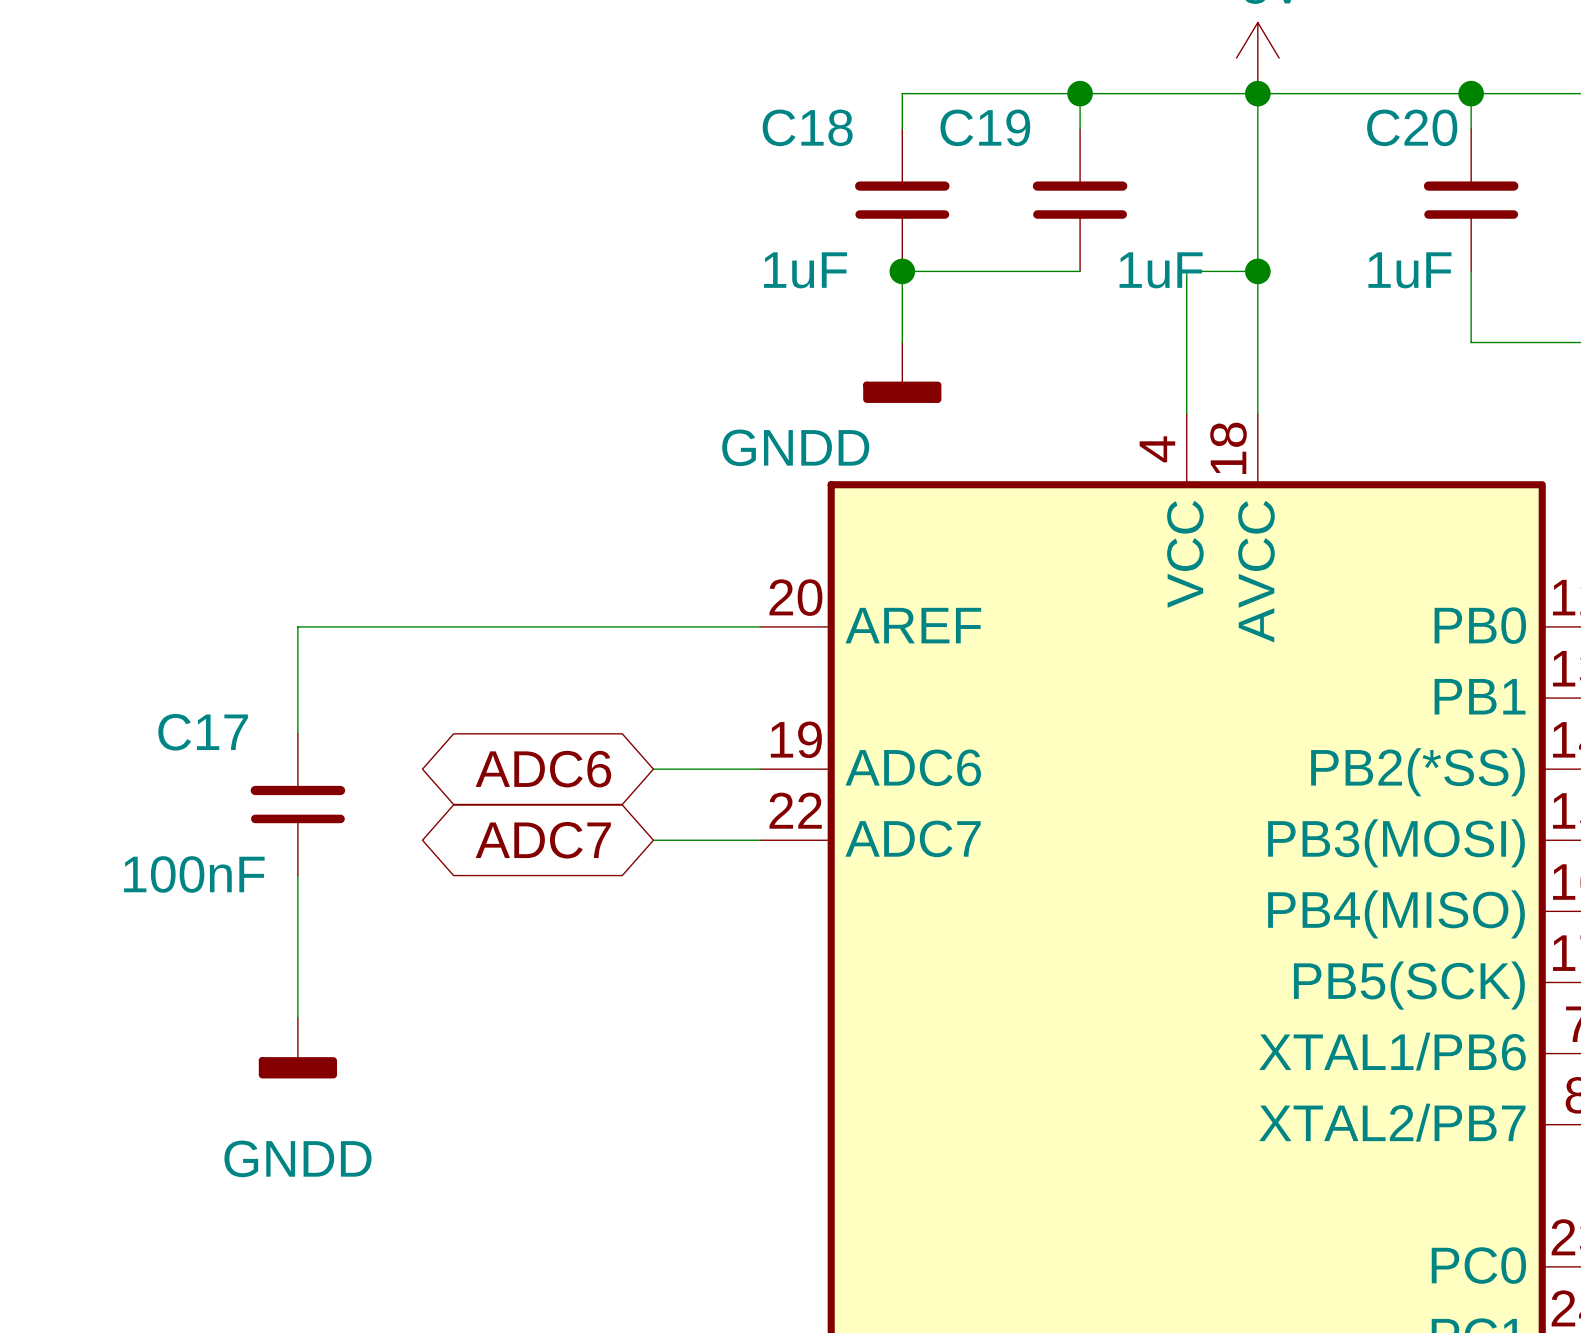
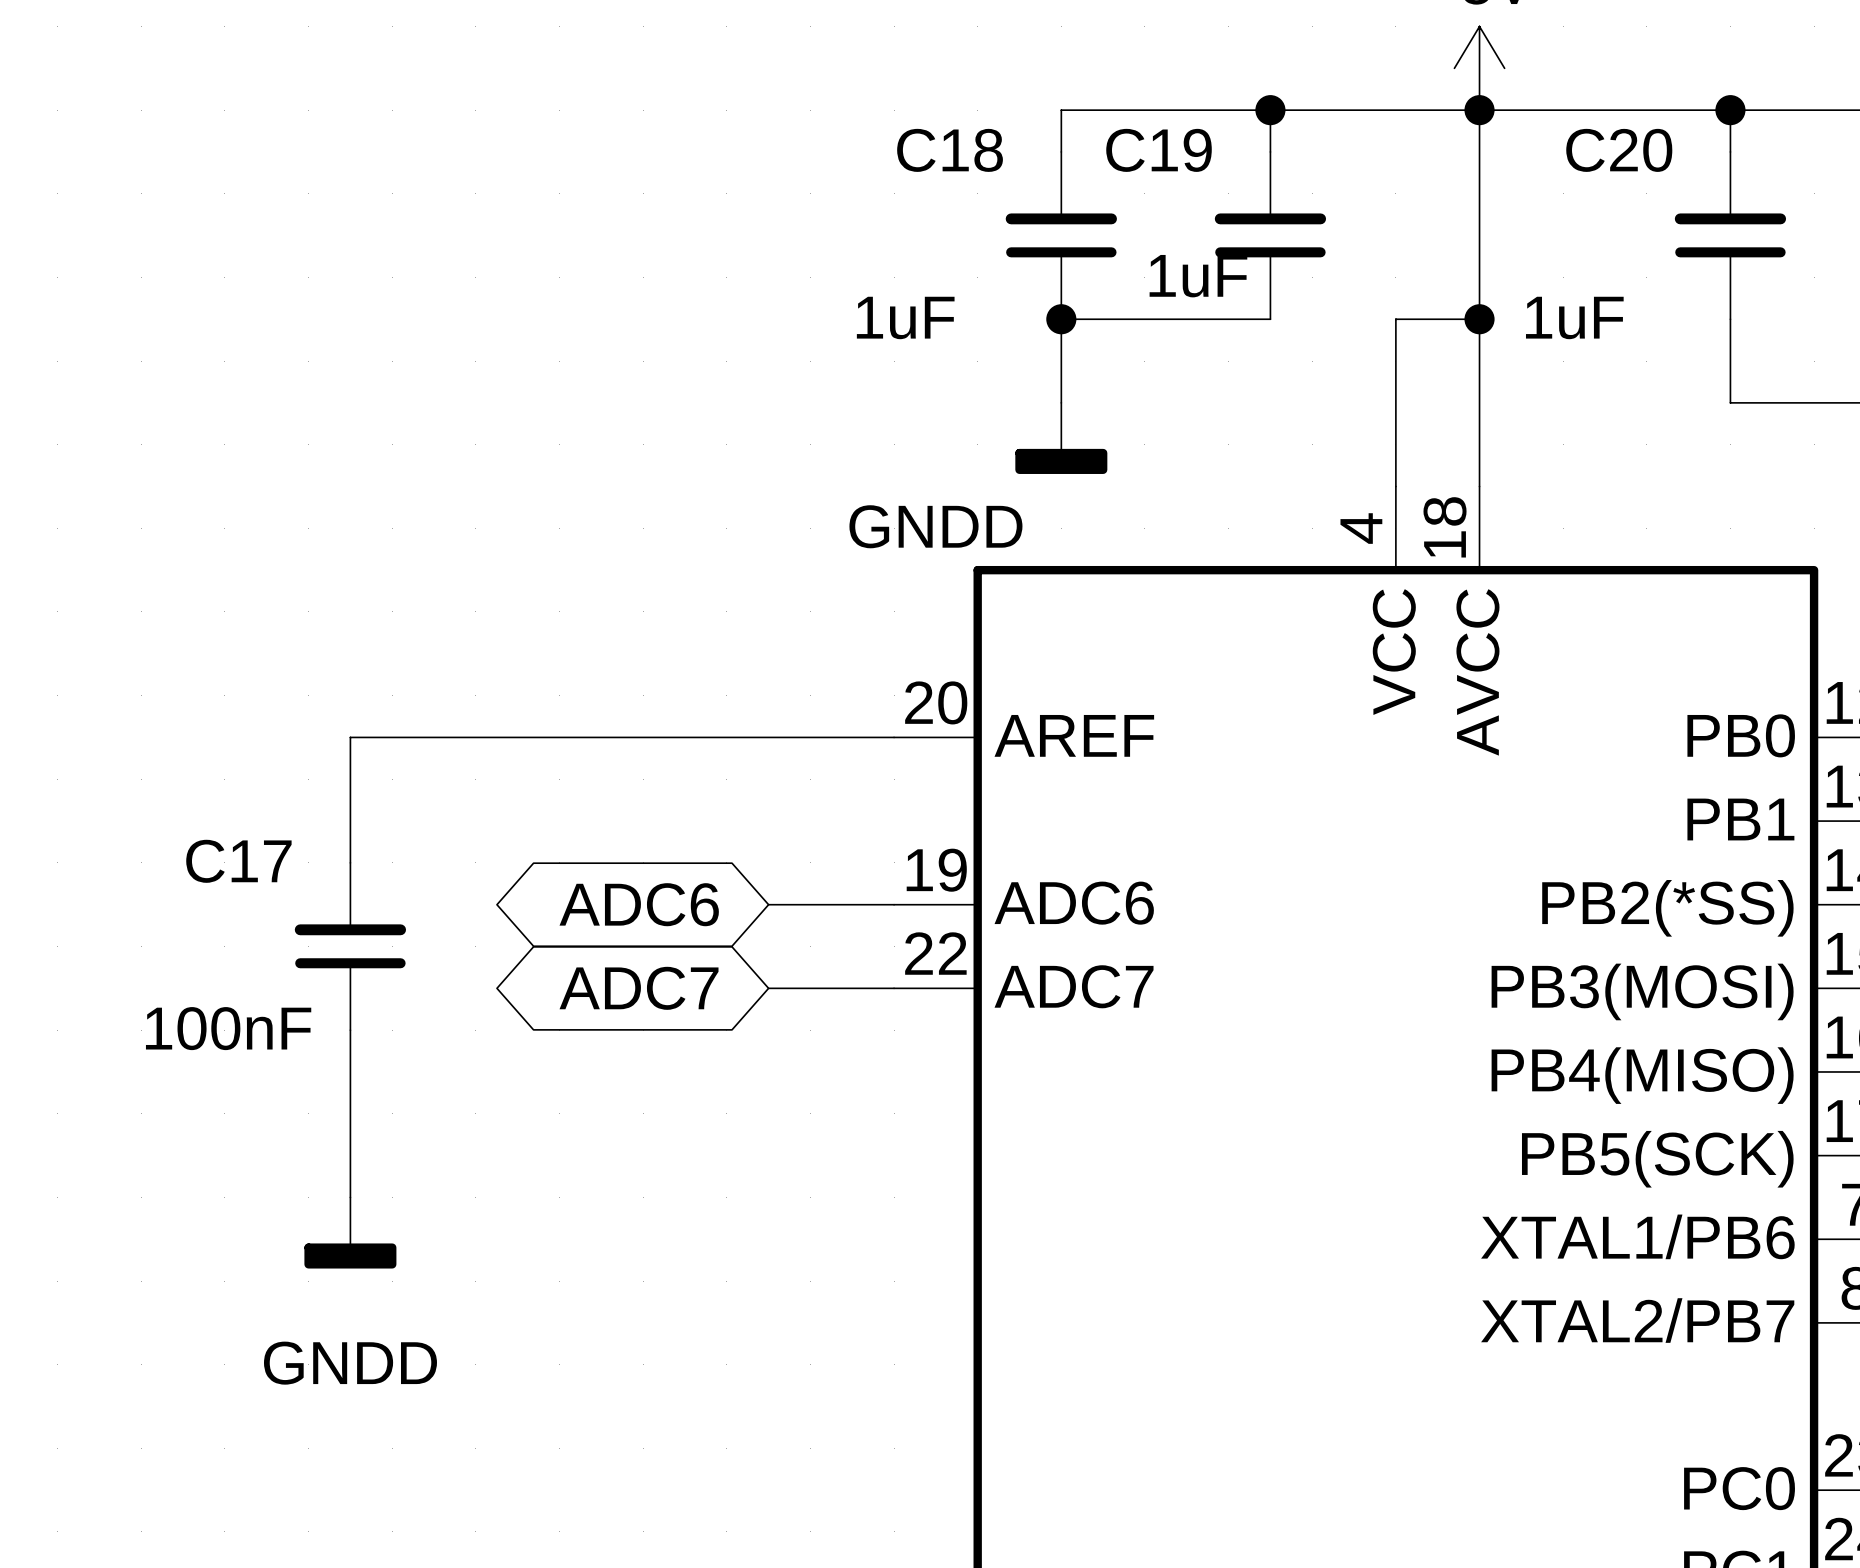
C20 name position: C20 (1412, 127) -> C20 (1619, 150)
C18 value position: 1uF (805, 270) -> 1uF (905, 317)
C19 value position: 1uF (1161, 270) -> 1uF (1198, 276)
C20 value position: 1uF (1409, 270) -> 1uF (1574, 317)

